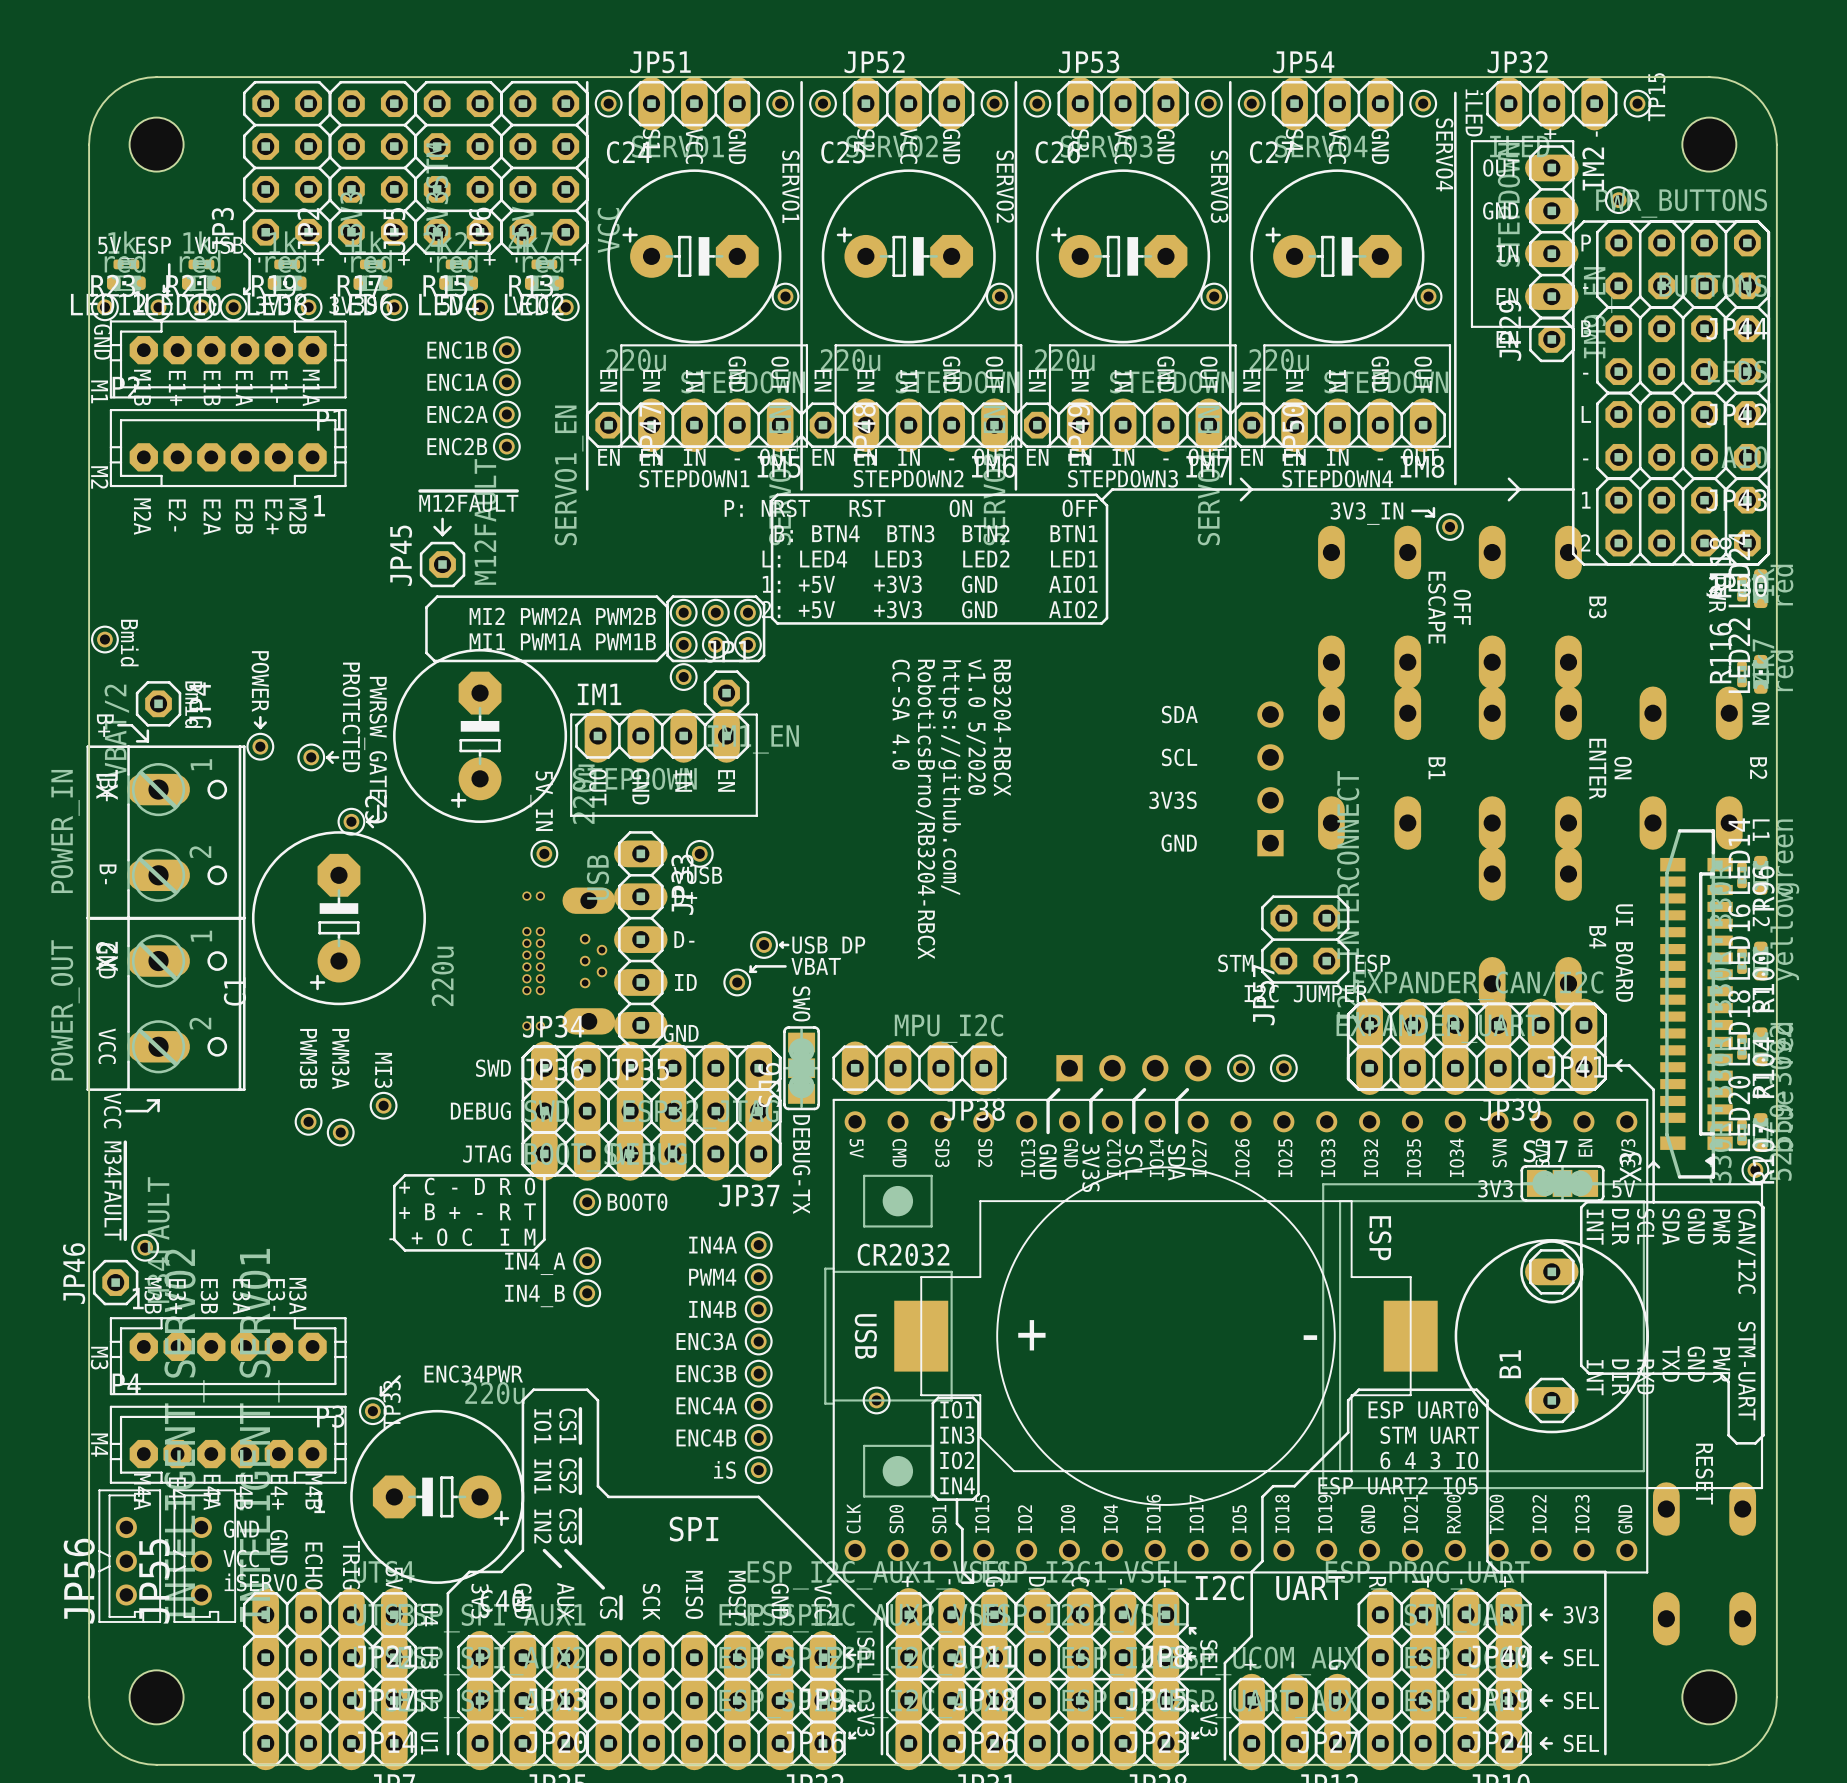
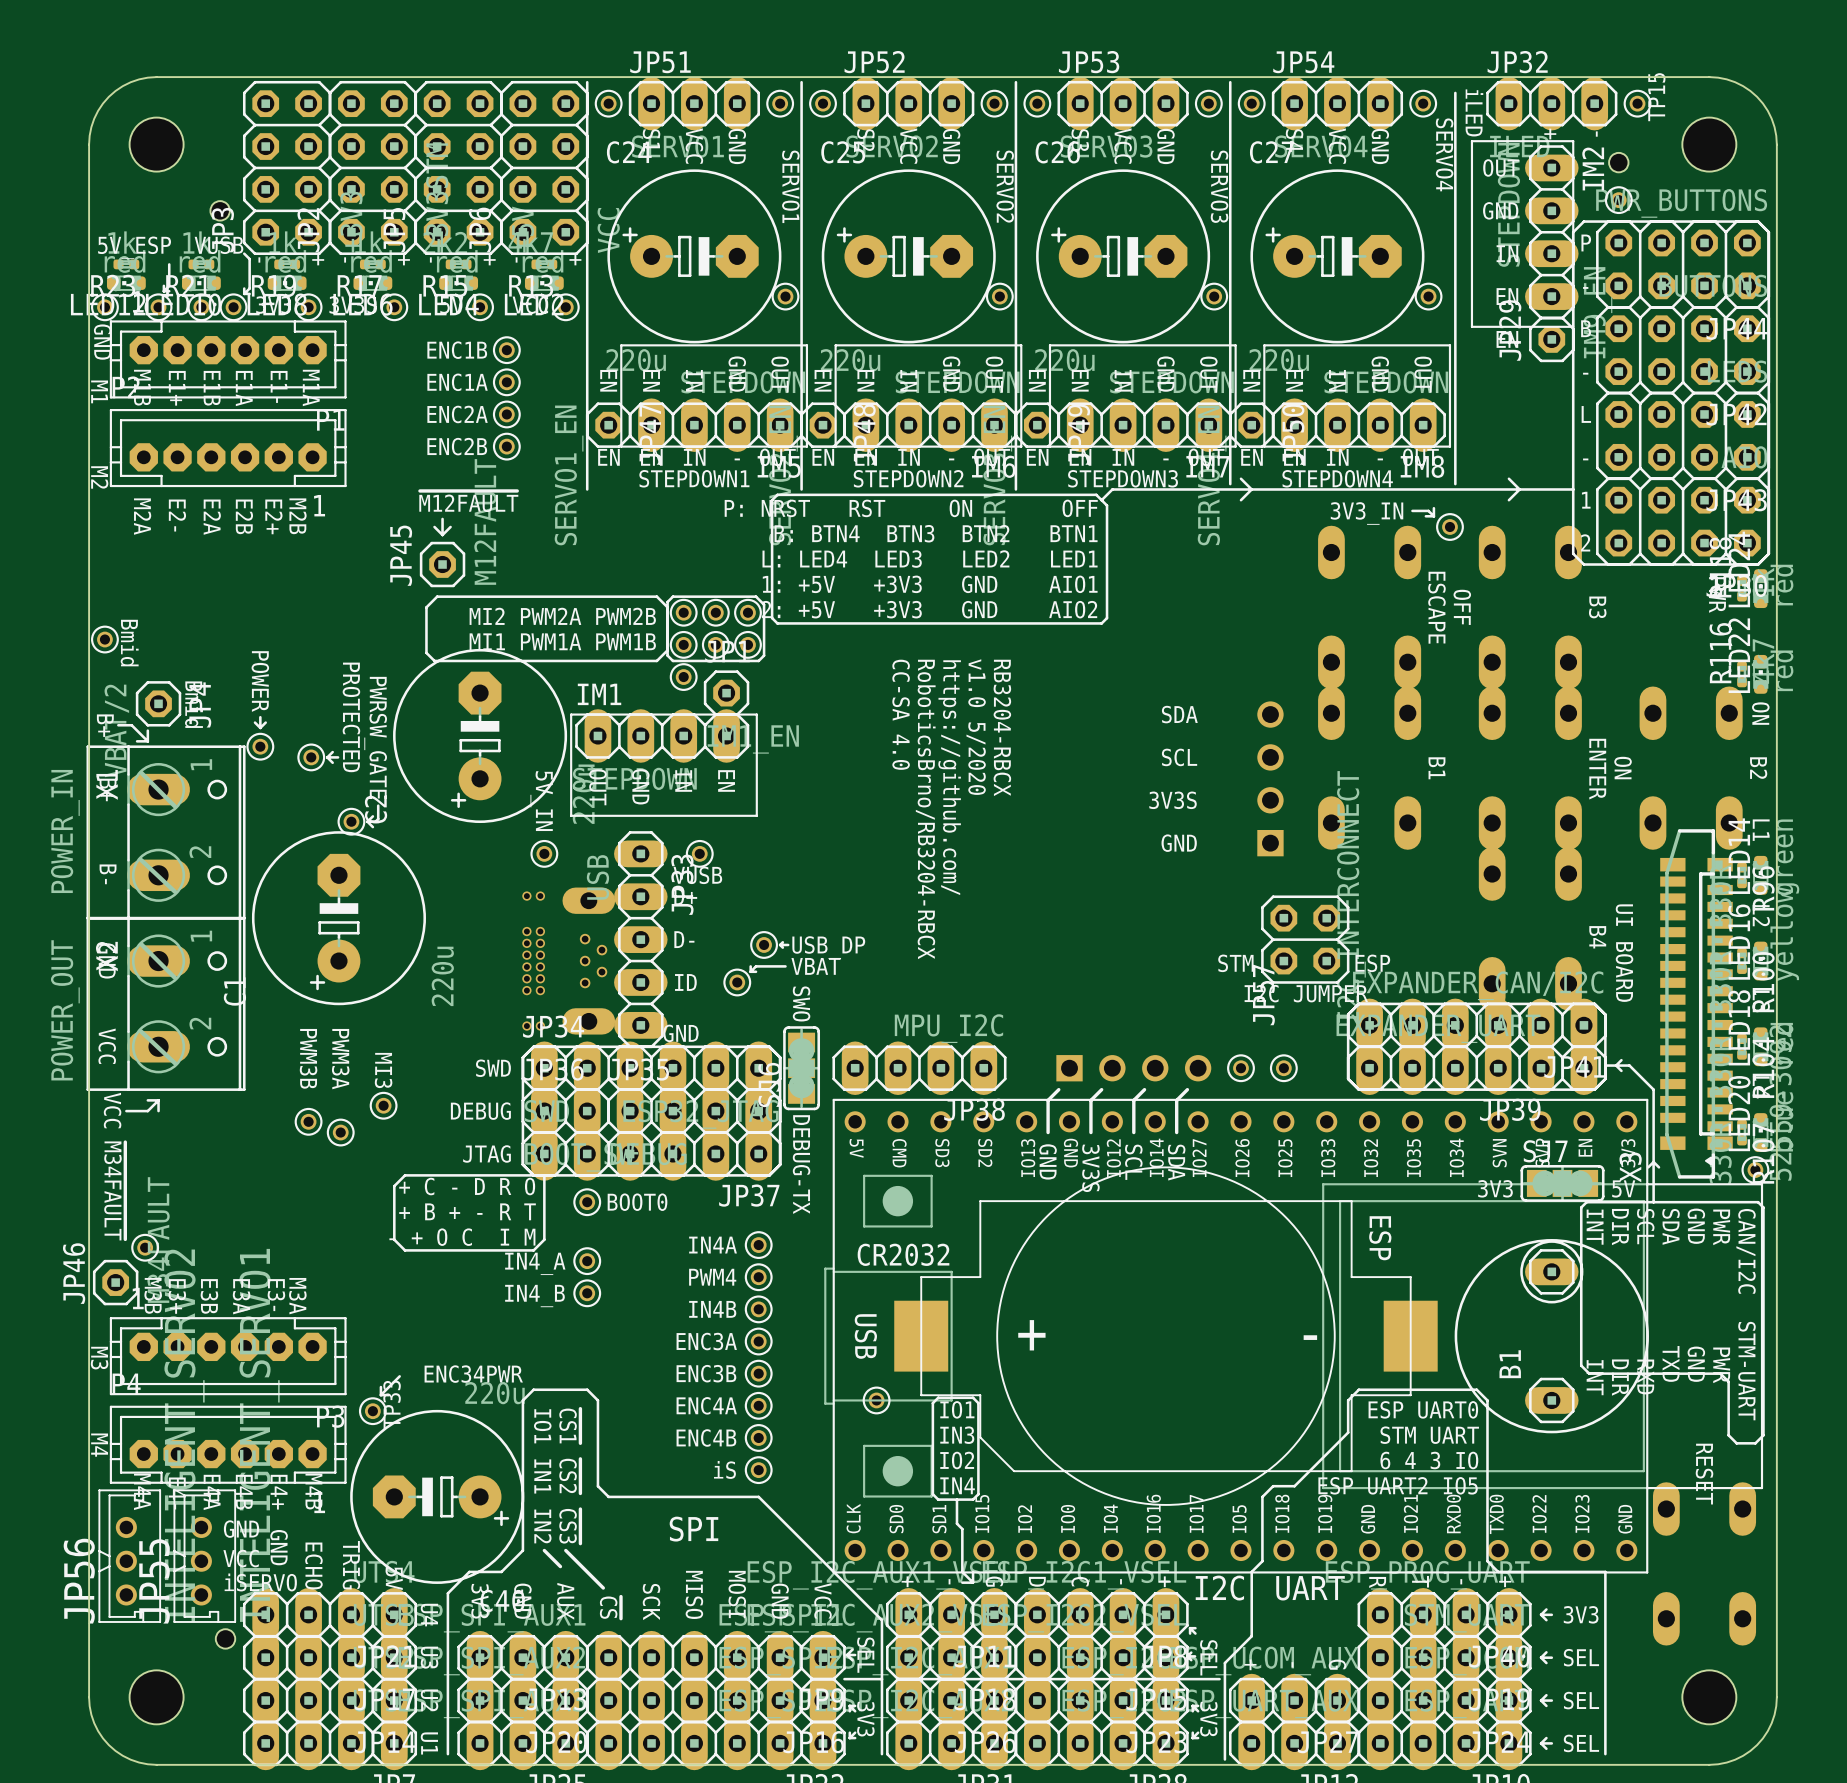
hole: none -> (1618, 162)
hole: none -> (220, 210)
hole: none -> (225, 1638)

